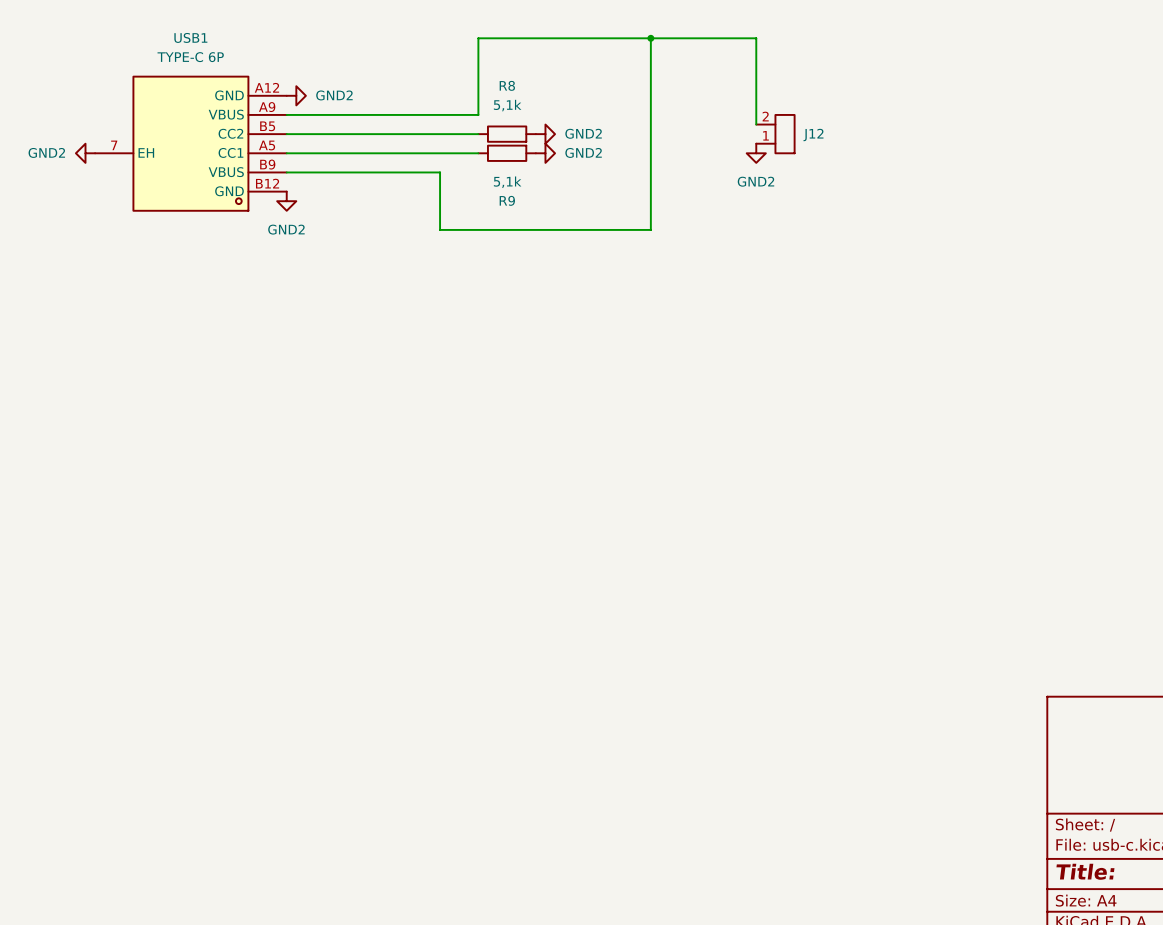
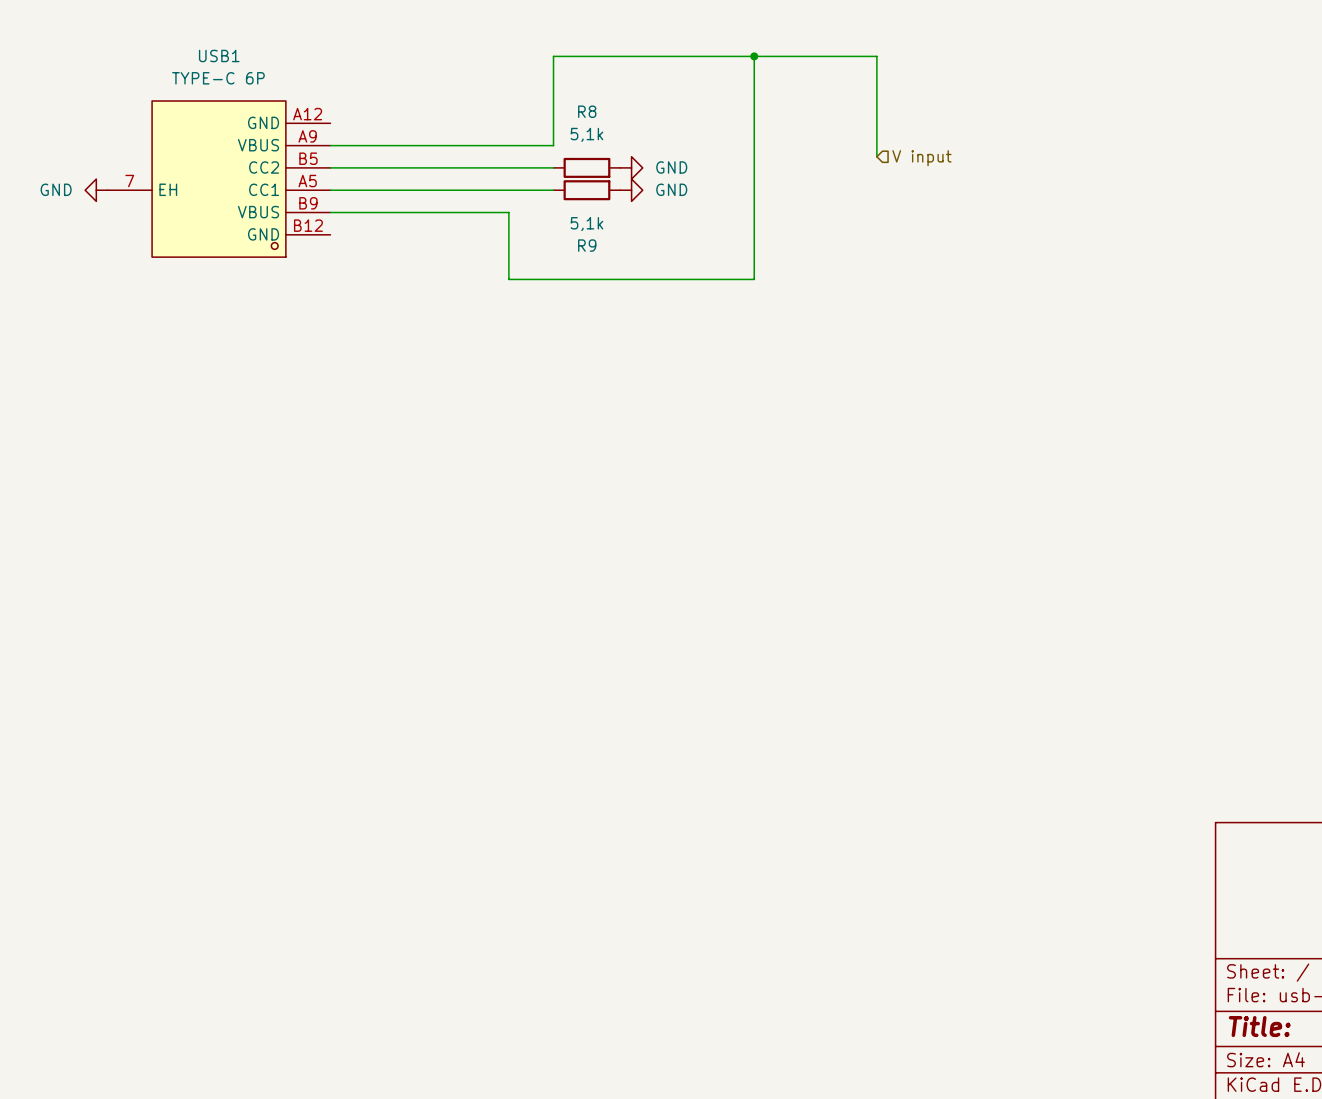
power symbol: GND2 (296, 95) -> none
hierarchical label: none -> V input (921, 158)
power symbol: GND2 (545, 134) -> GND (631, 167)
J12: (775, 134) -> none
power symbol: GND2 (85, 153) -> GND (96, 190)
power symbol: GND2 (545, 153) -> GND (631, 190)
power symbol: GND2 (756, 153) -> none
power symbol: GND2 (286, 201) -> none

